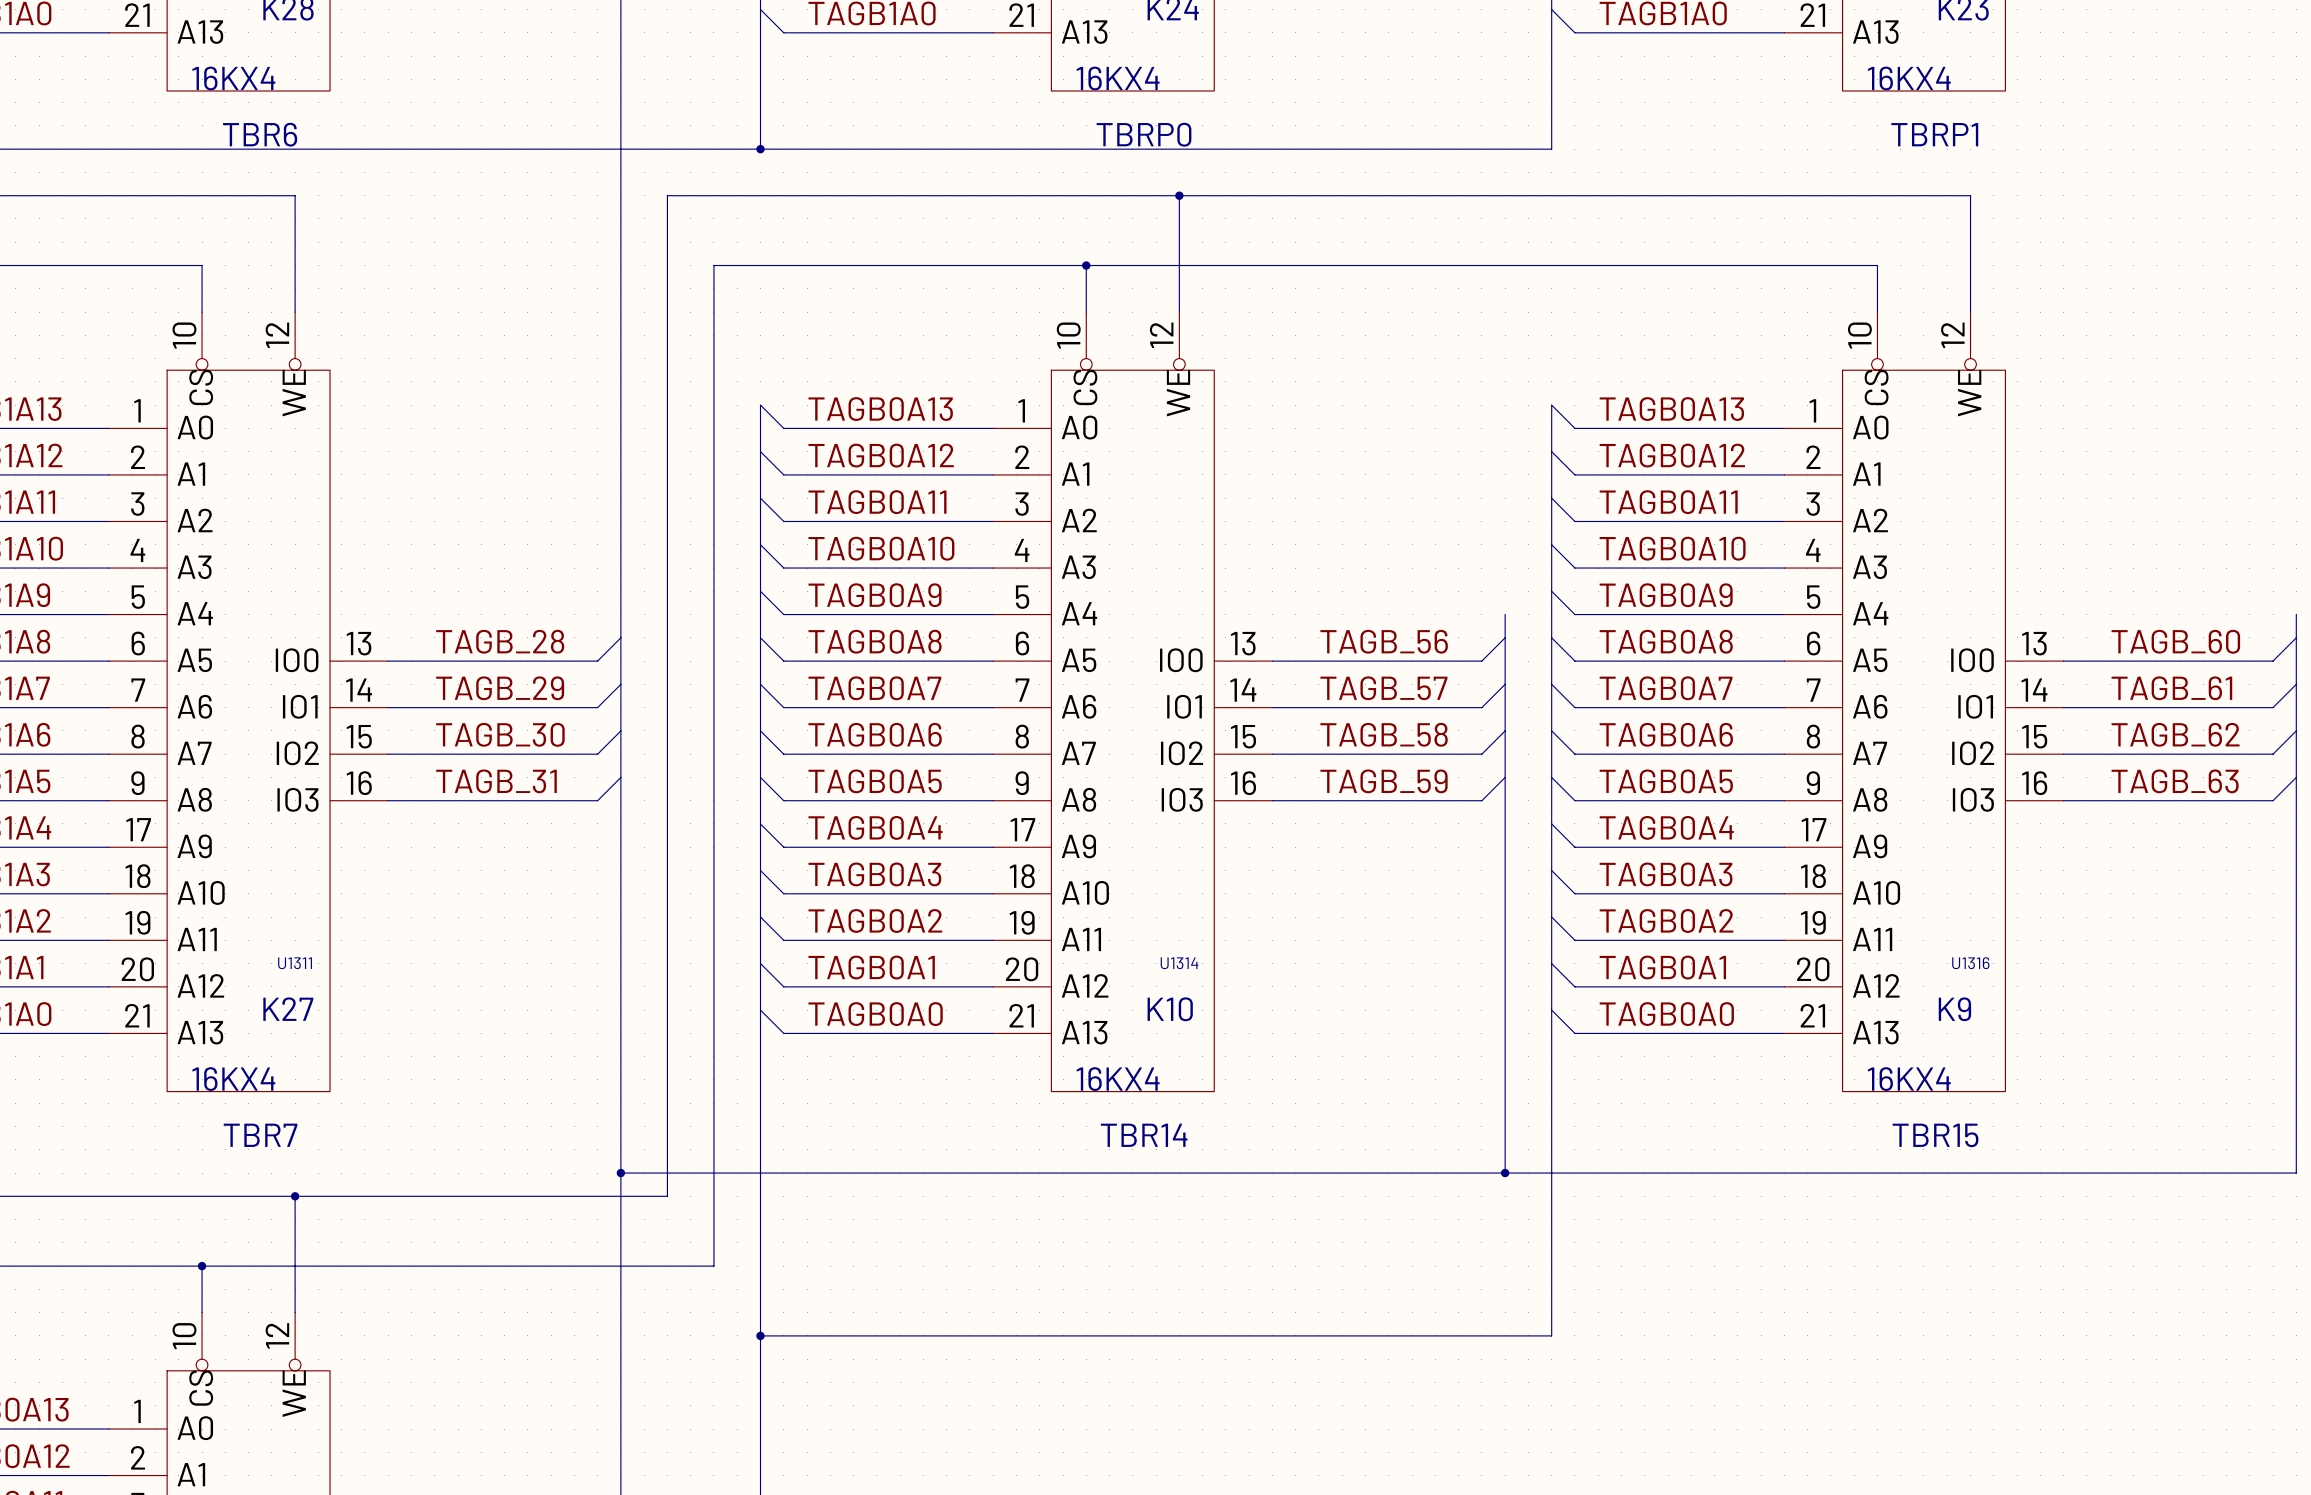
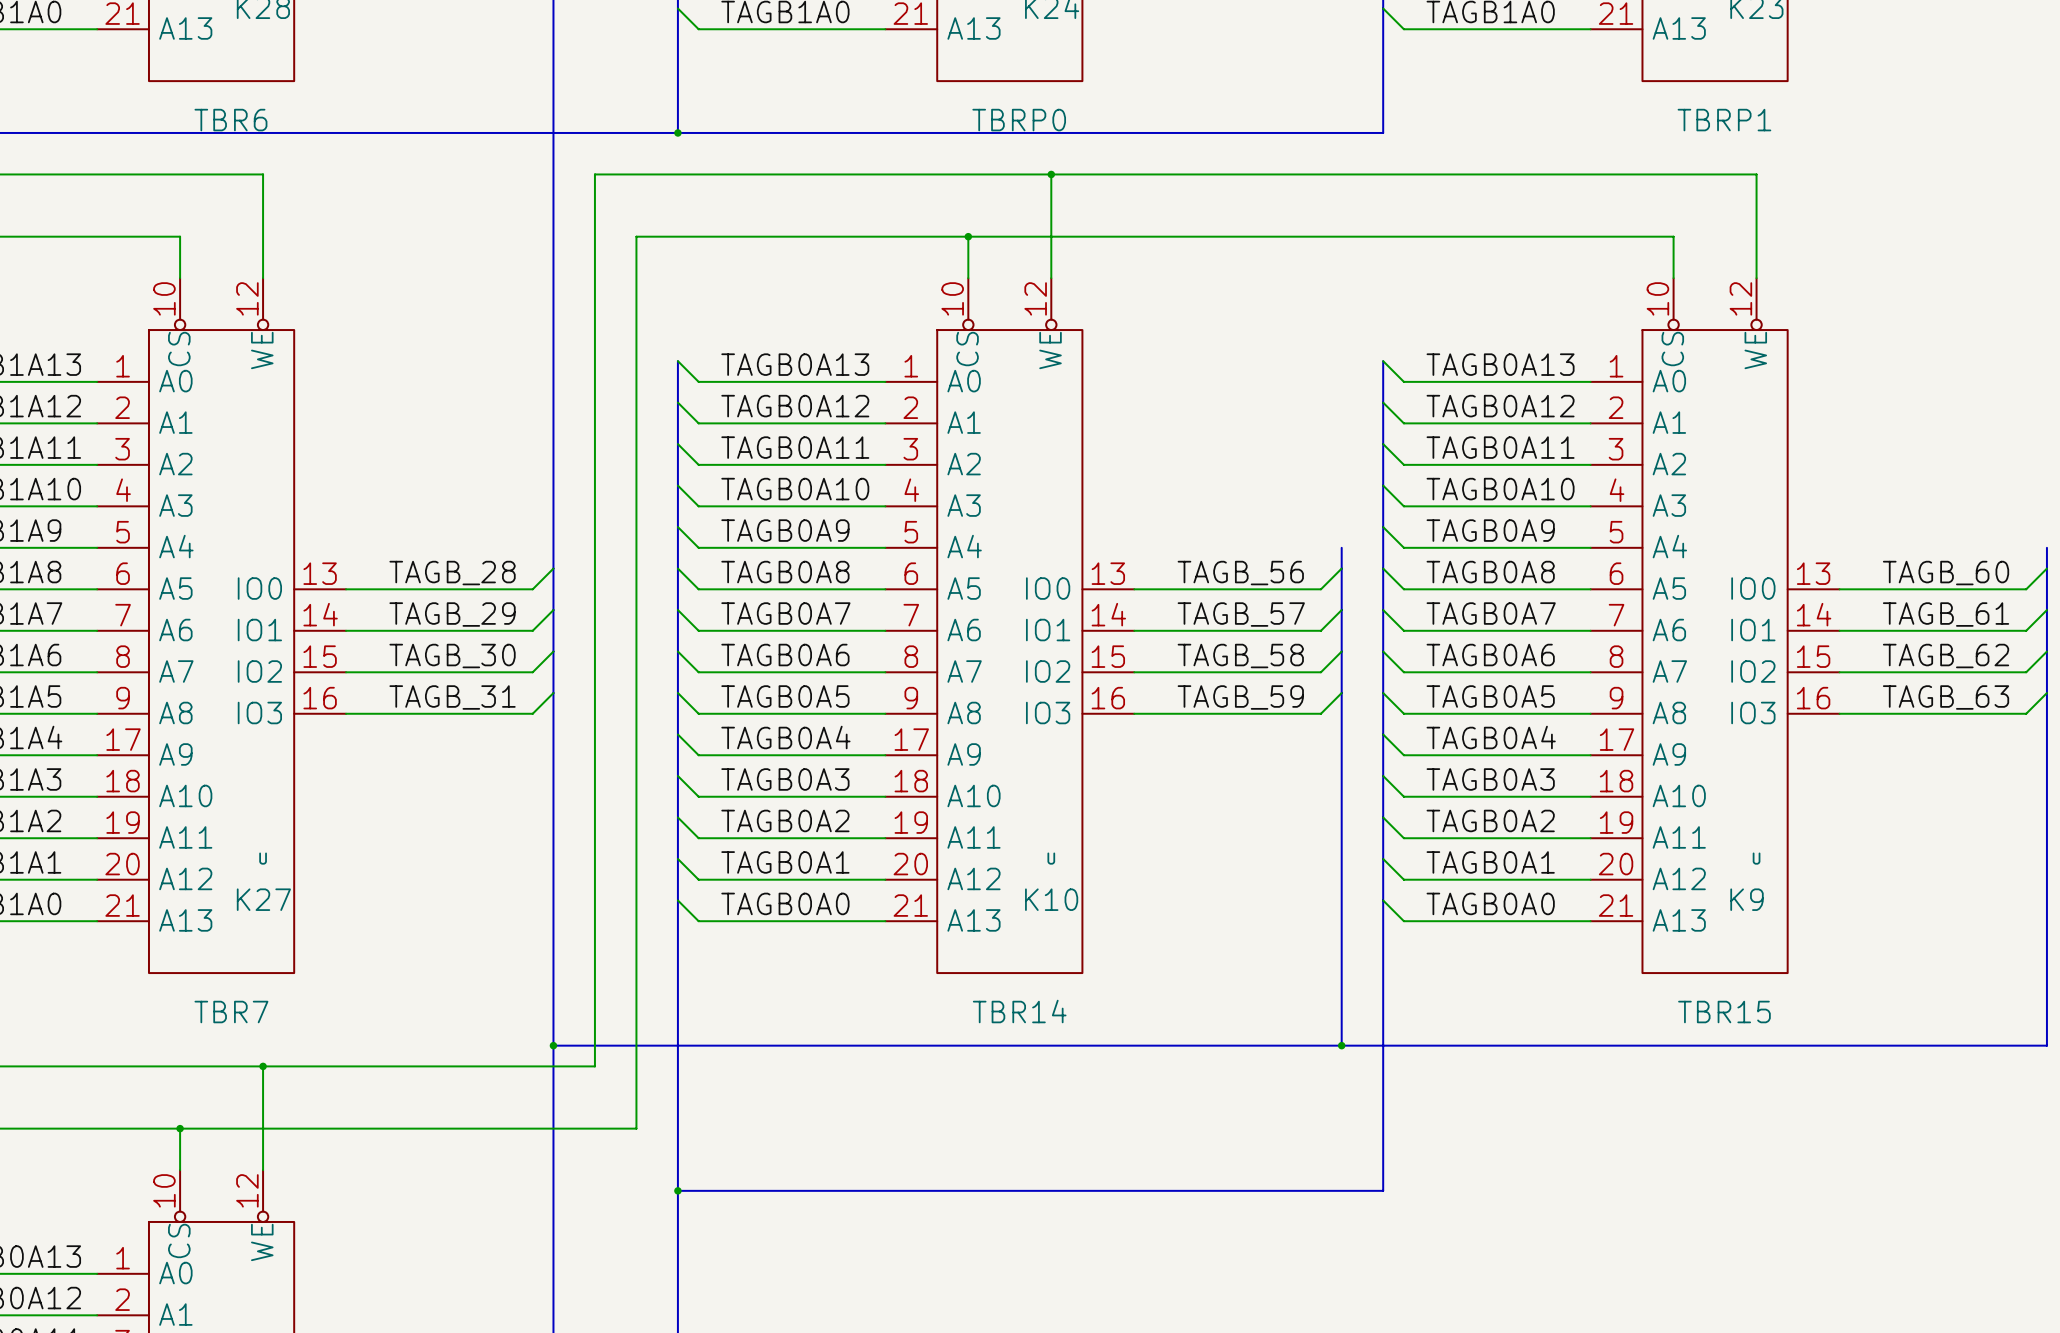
part value: 16KX4 (233, 78) -> none
part value: 16KX4 (1118, 78) -> none
part value: 16KX4 (1909, 78) -> none
U1311 name: U1311 (295, 963) -> U (263, 858)
U1314 name: U1314 (1179, 963) -> U (1051, 858)
U1316 name: U1316 (1970, 963) -> U (1756, 858)
U1311 value: 16KX4 (233, 1079) -> none
U1314 value: 16KX4 (1118, 1079) -> none
U1316 value: 16KX4 (1909, 1079) -> none

